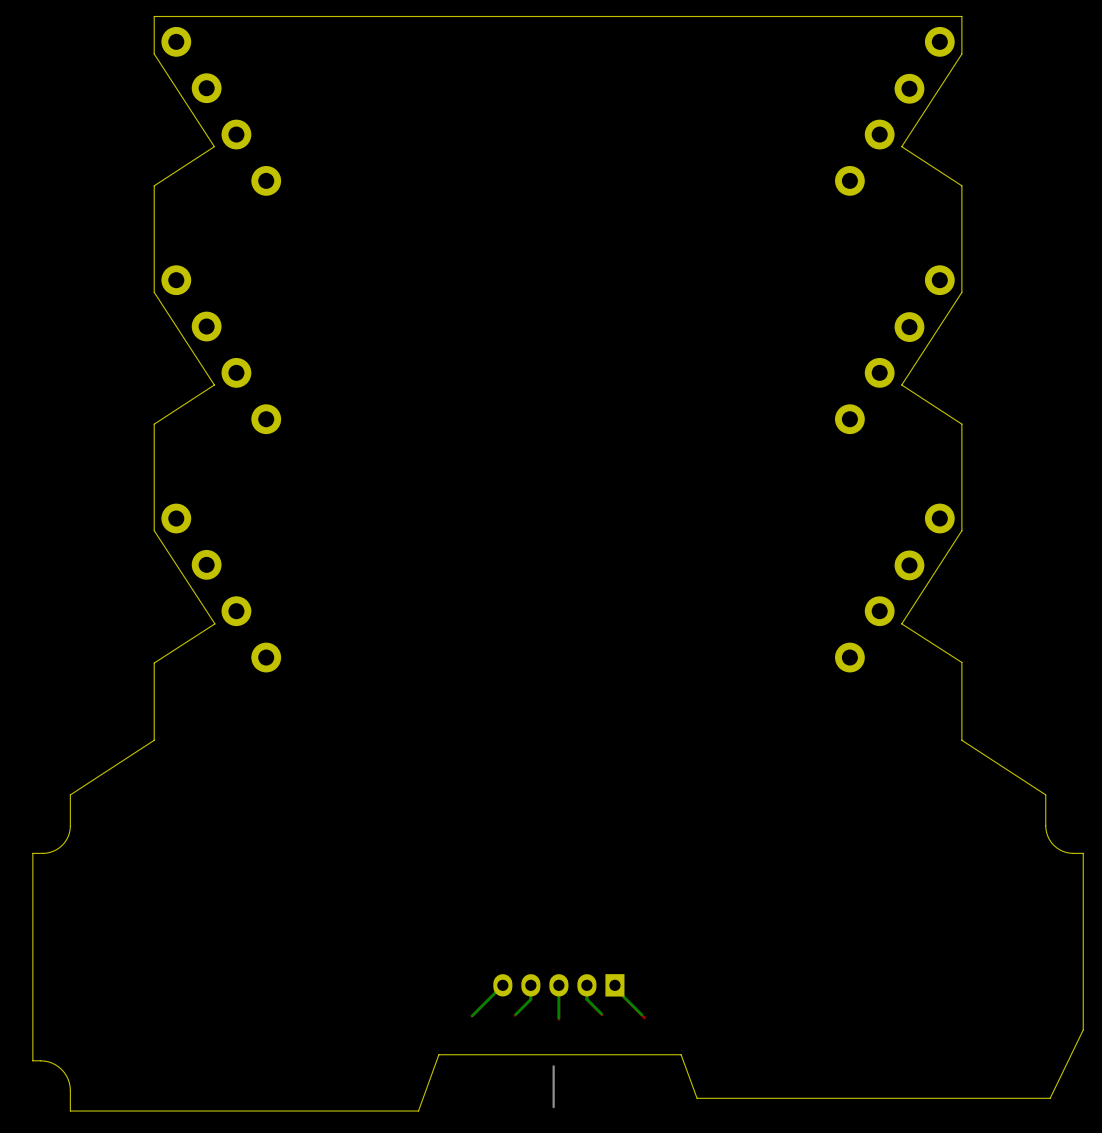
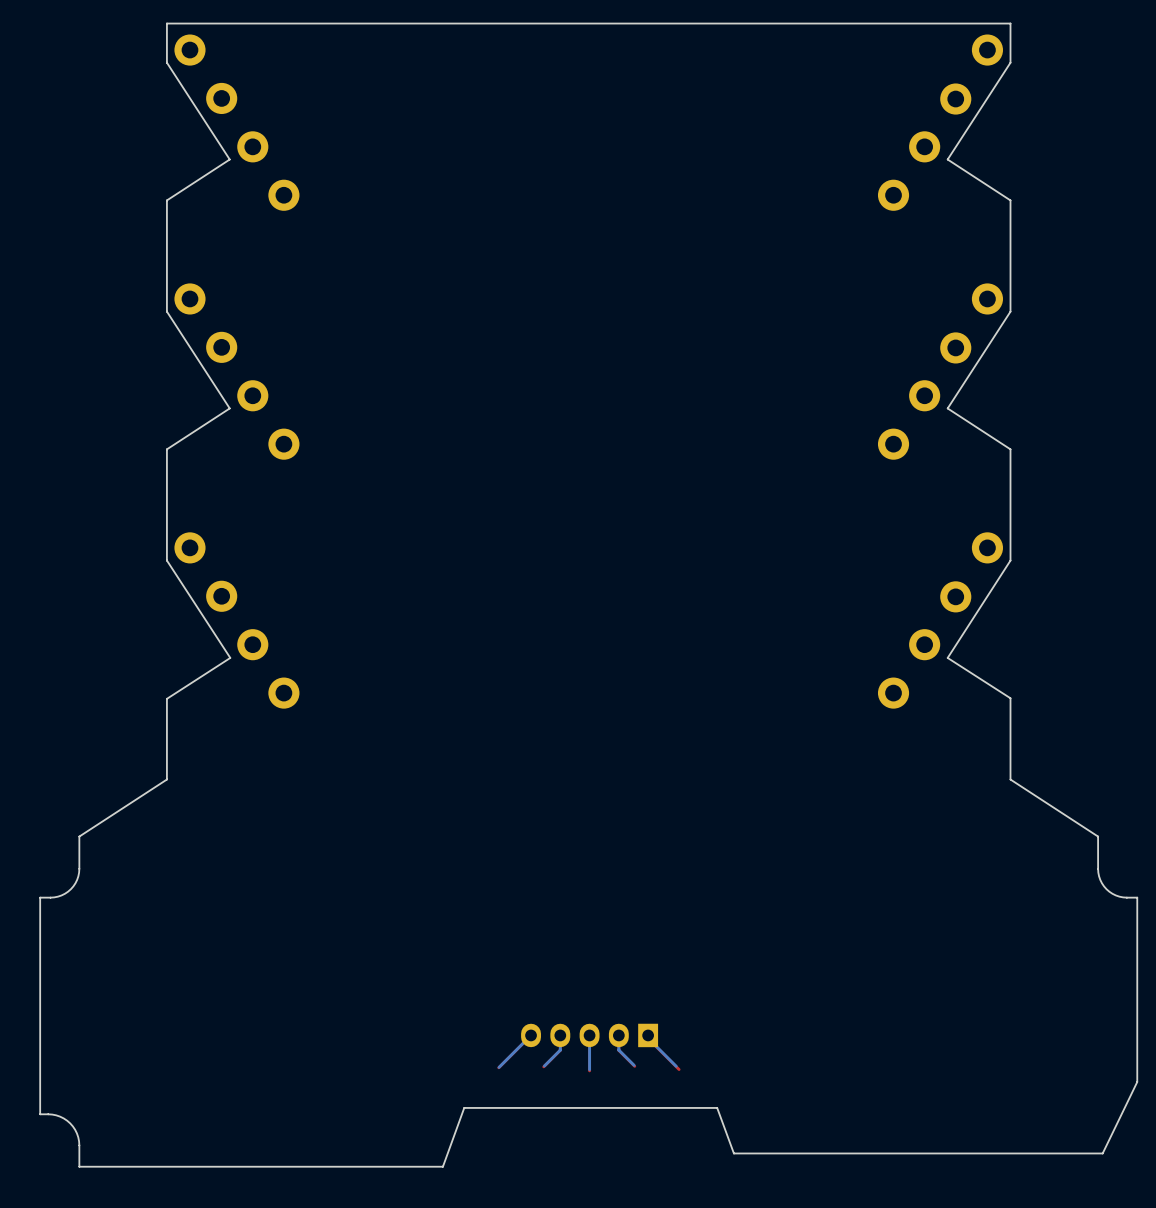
line: (553, 1066) (553, 1107) -> none

